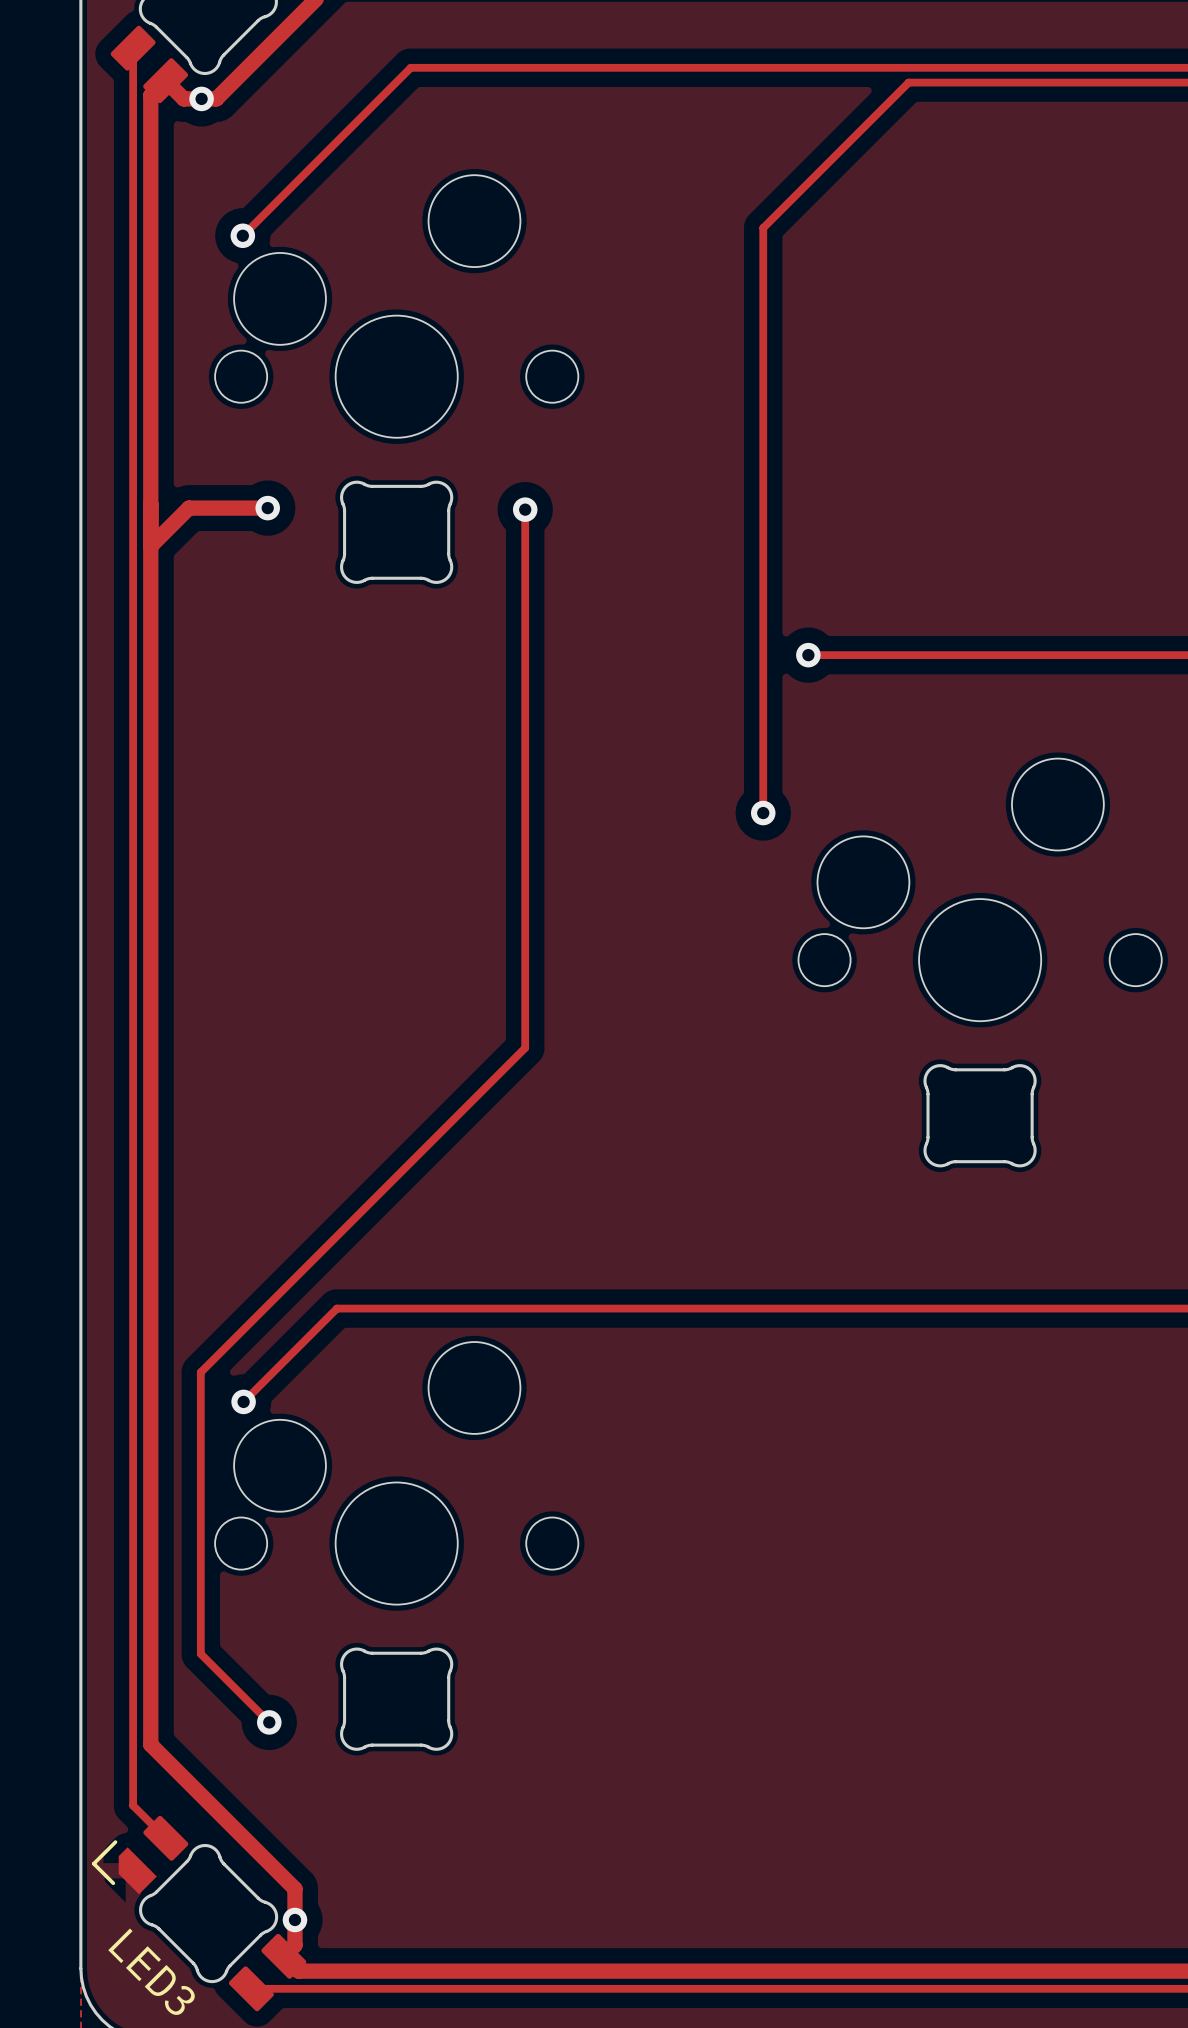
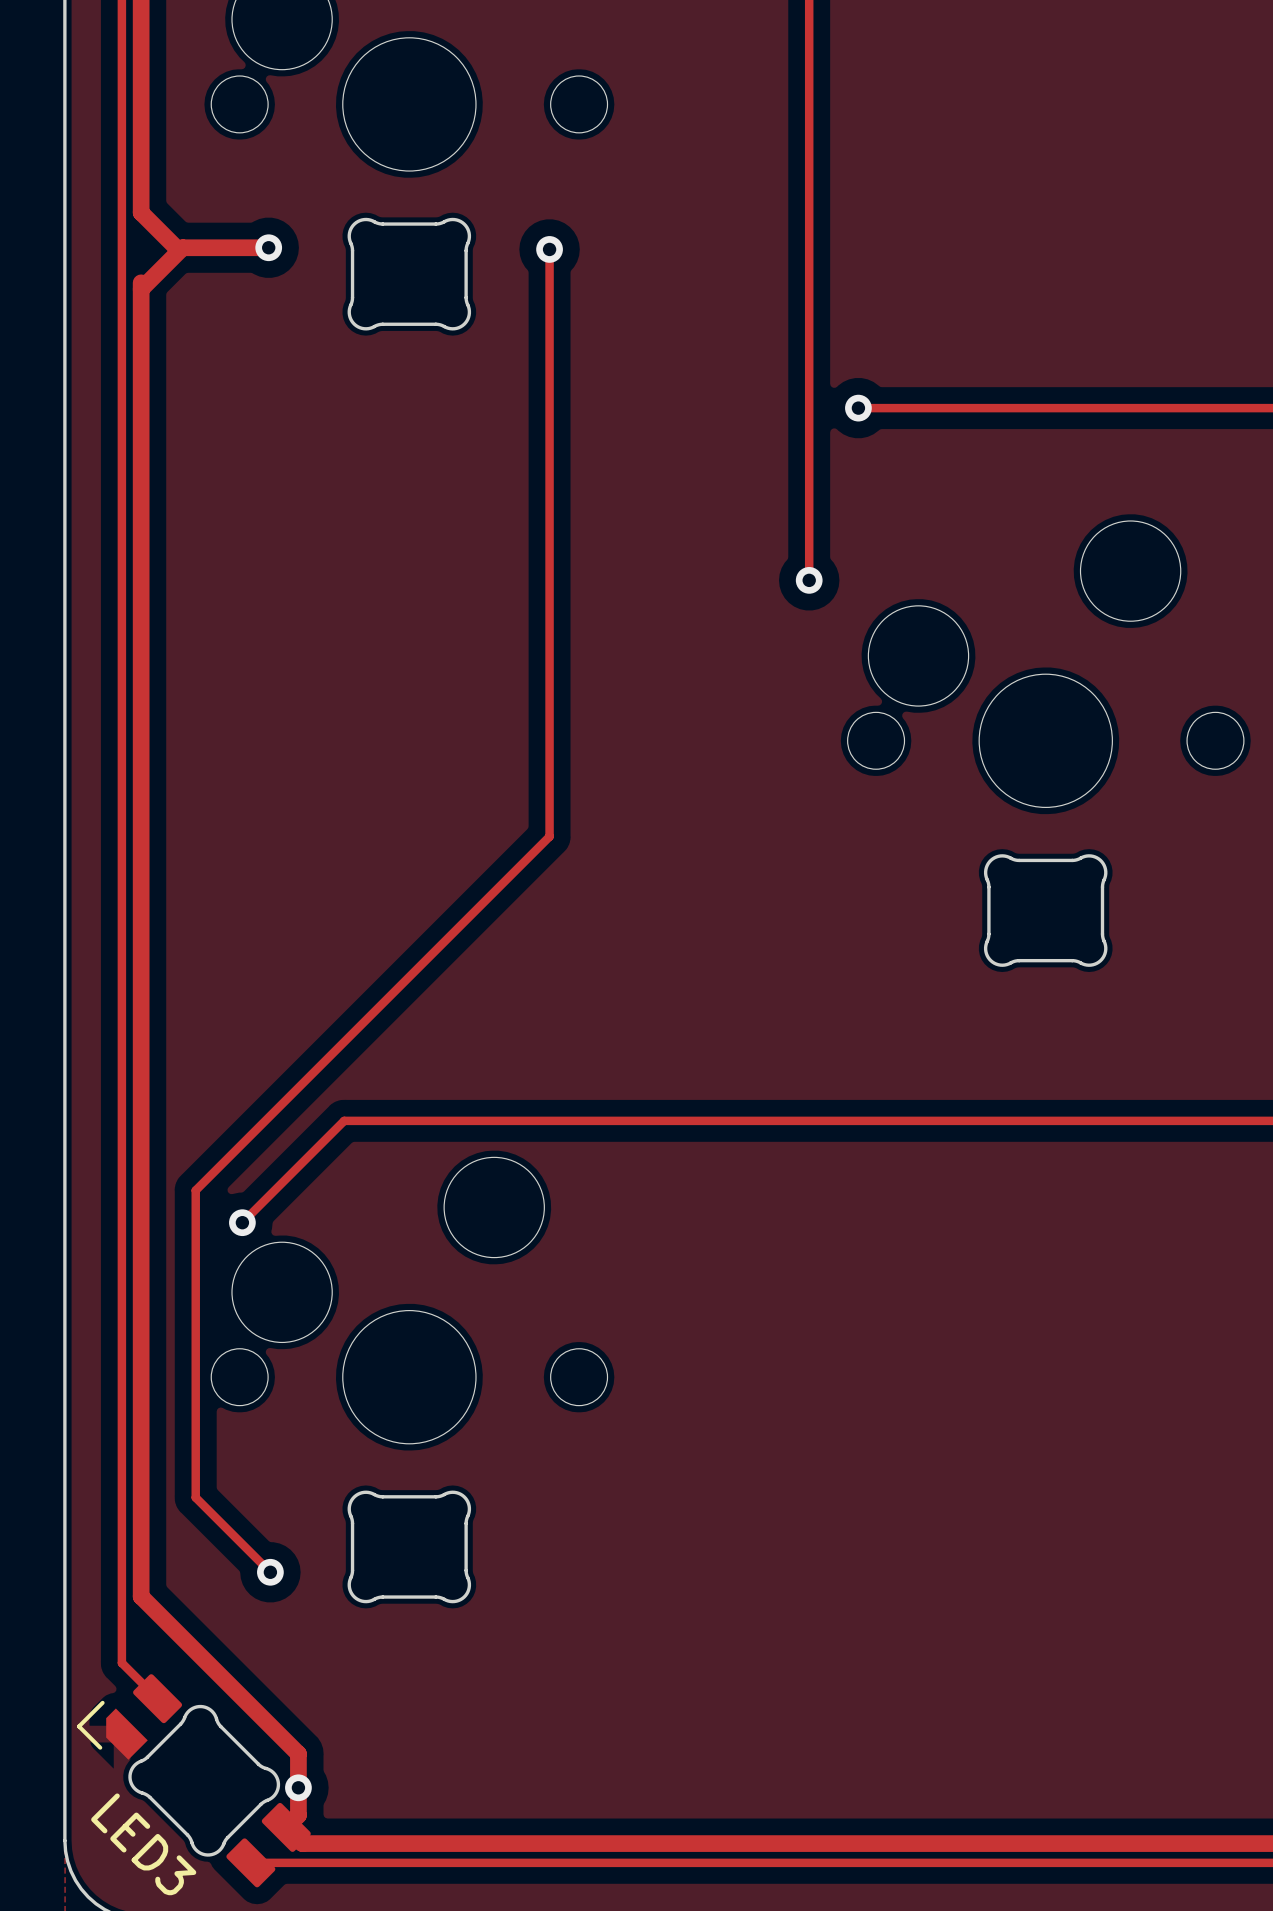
track: (150, 475) (150, 540) -> (141, 212) (176, 247)

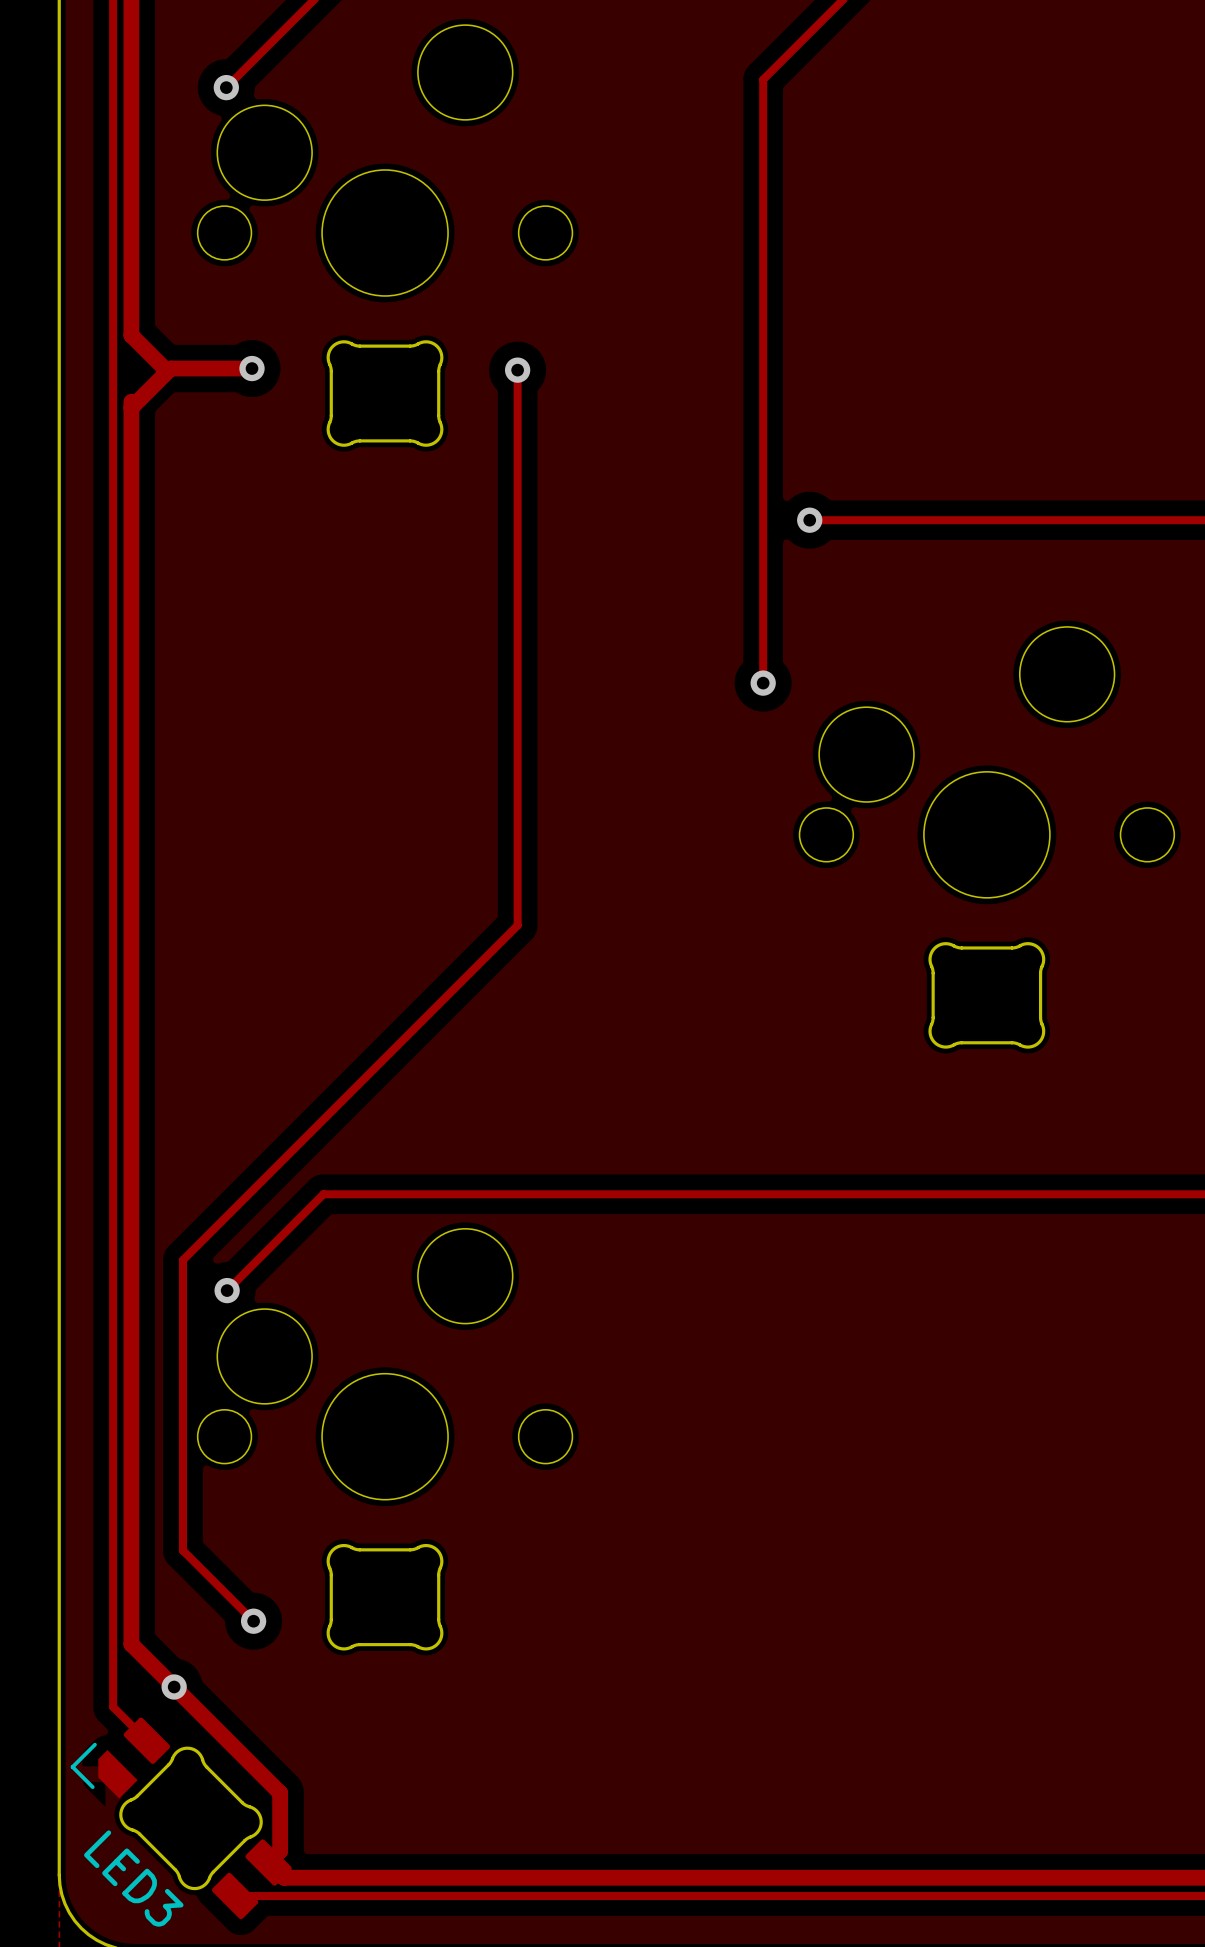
via position: (298, 1787) -> (174, 1687)

